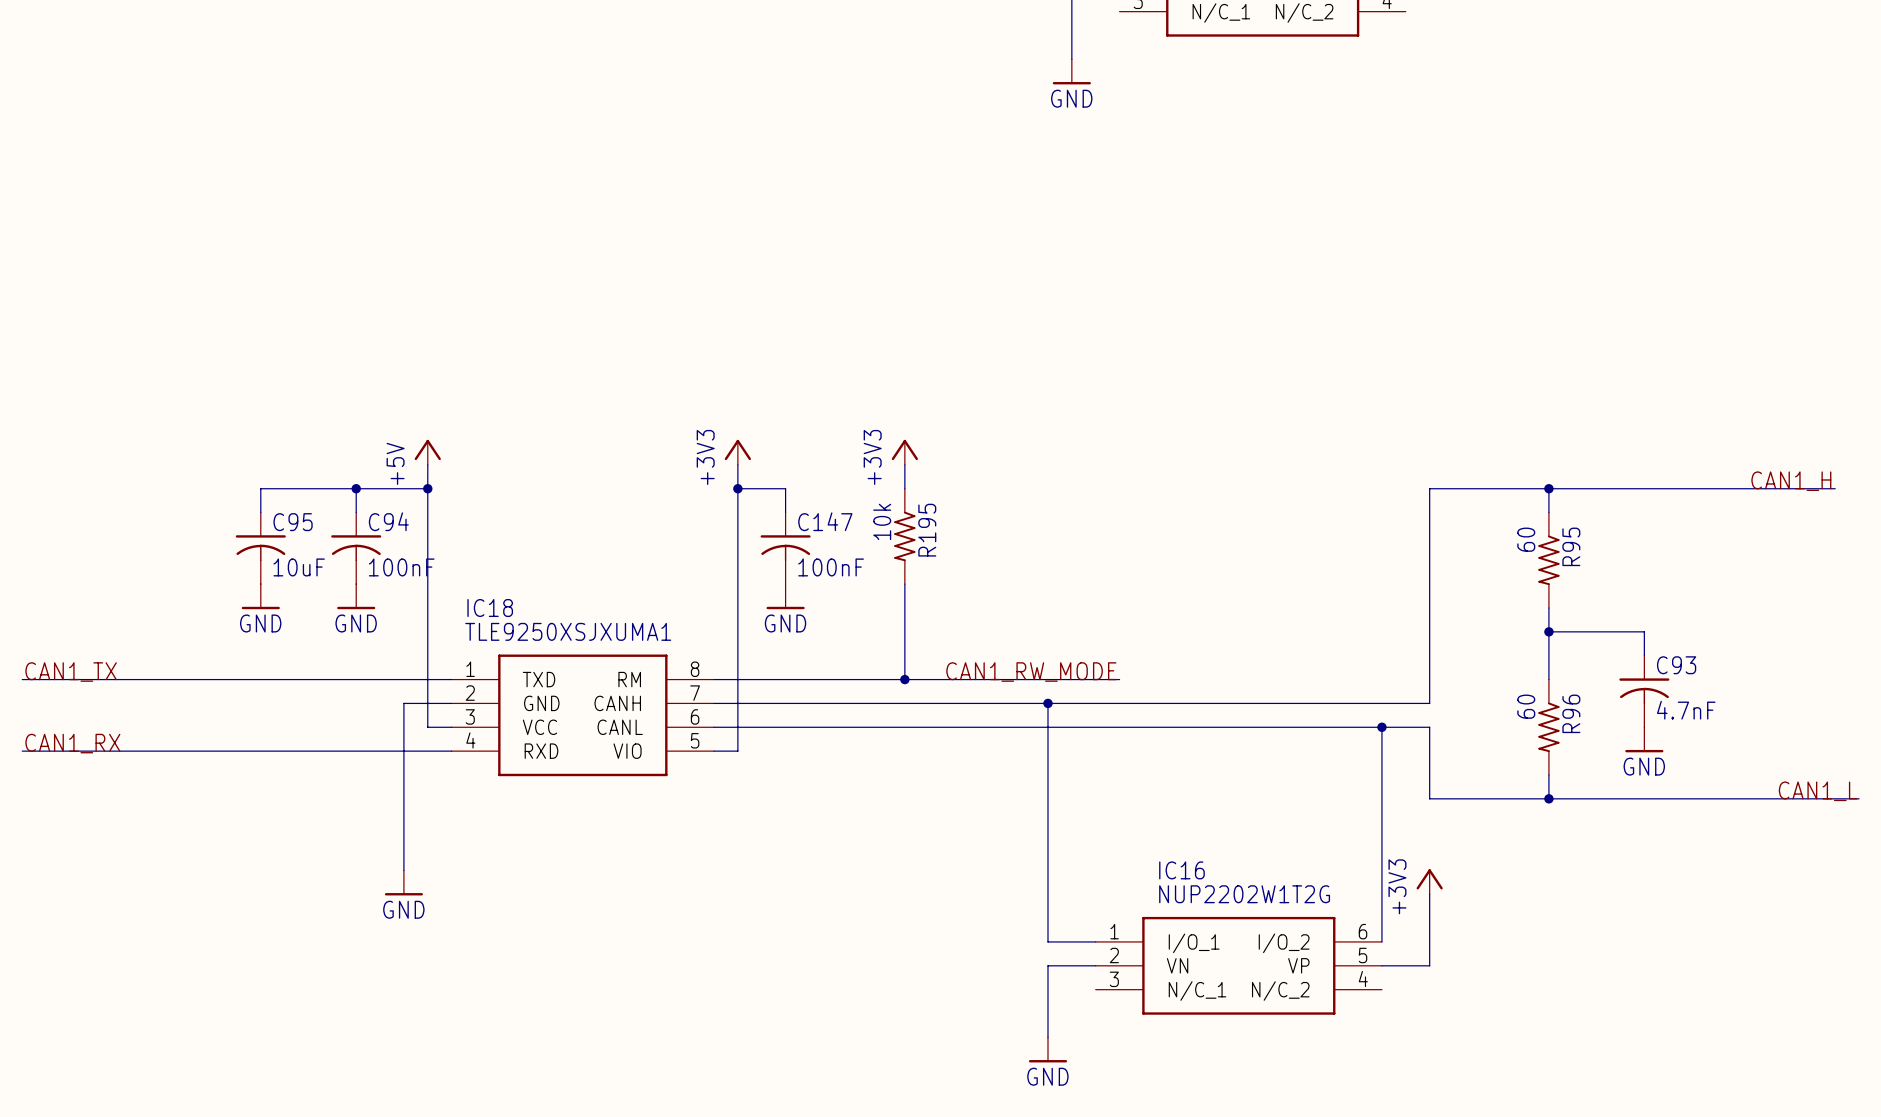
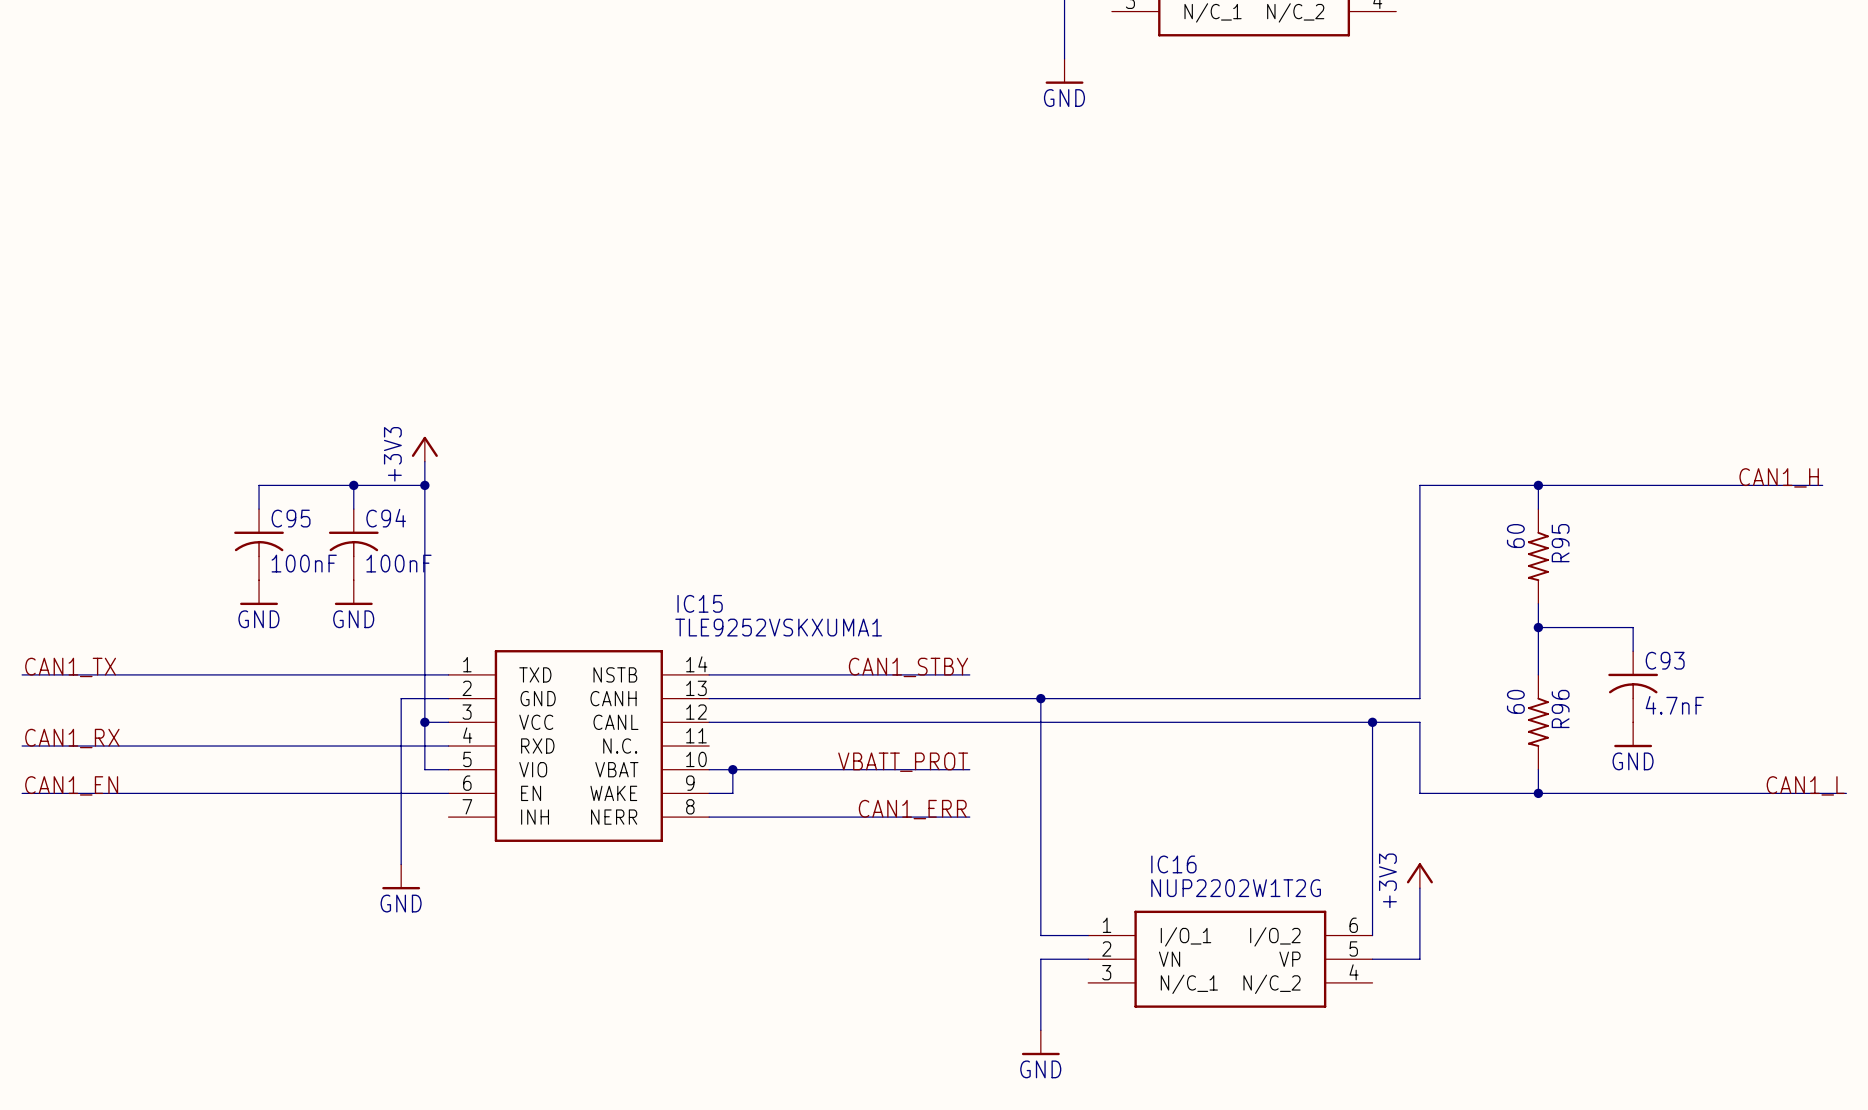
power symbol: +5V (427, 452) -> +3V3 (424, 449)
power symbol: +3V3 (737, 452) -> none
power symbol: +3V3 (904, 452) -> none
wire: (737, 464) (737, 751) (714, 751) -> none
wire: (904, 464) (904, 488) -> none
wire: (737, 488) (785, 488) (785, 512) -> none
junction: (737, 488) -> none
R195: 10k (904, 536) -> none
C147: 100nF (785, 548) -> none
C95 value: 10uF (299, 567) -> 100nF (304, 563)
wire: (904, 584) (904, 679) -> none
power symbol: GND (785, 596) -> none
label: none -> CAN1_STBY (908, 667)
label: CAN1_RW_MODE (1031, 672) -> none
junction: (904, 679) -> none
wire: (976, 679) (1119, 679) -> none
IC18: TLE9250XSJXUMA1 (582, 715) -> none
wire: none -> (424, 722) (424, 769) (448, 769)
junction: none -> (424, 722)
IC15: none -> TLE9252VSKXUMA1 (578, 746)
label: none -> VBATT_PROT (903, 762)
wire: none -> (709, 769) (969, 769)
wire: none -> (732, 769) (732, 793) (709, 793)
junction: none -> (732, 769)
label: none -> CAN1_EN (71, 785)
wire: none -> (22, 793) (448, 793)
label: none -> CAN1_ERR (912, 809)
wire: none -> (709, 817) (969, 817)

